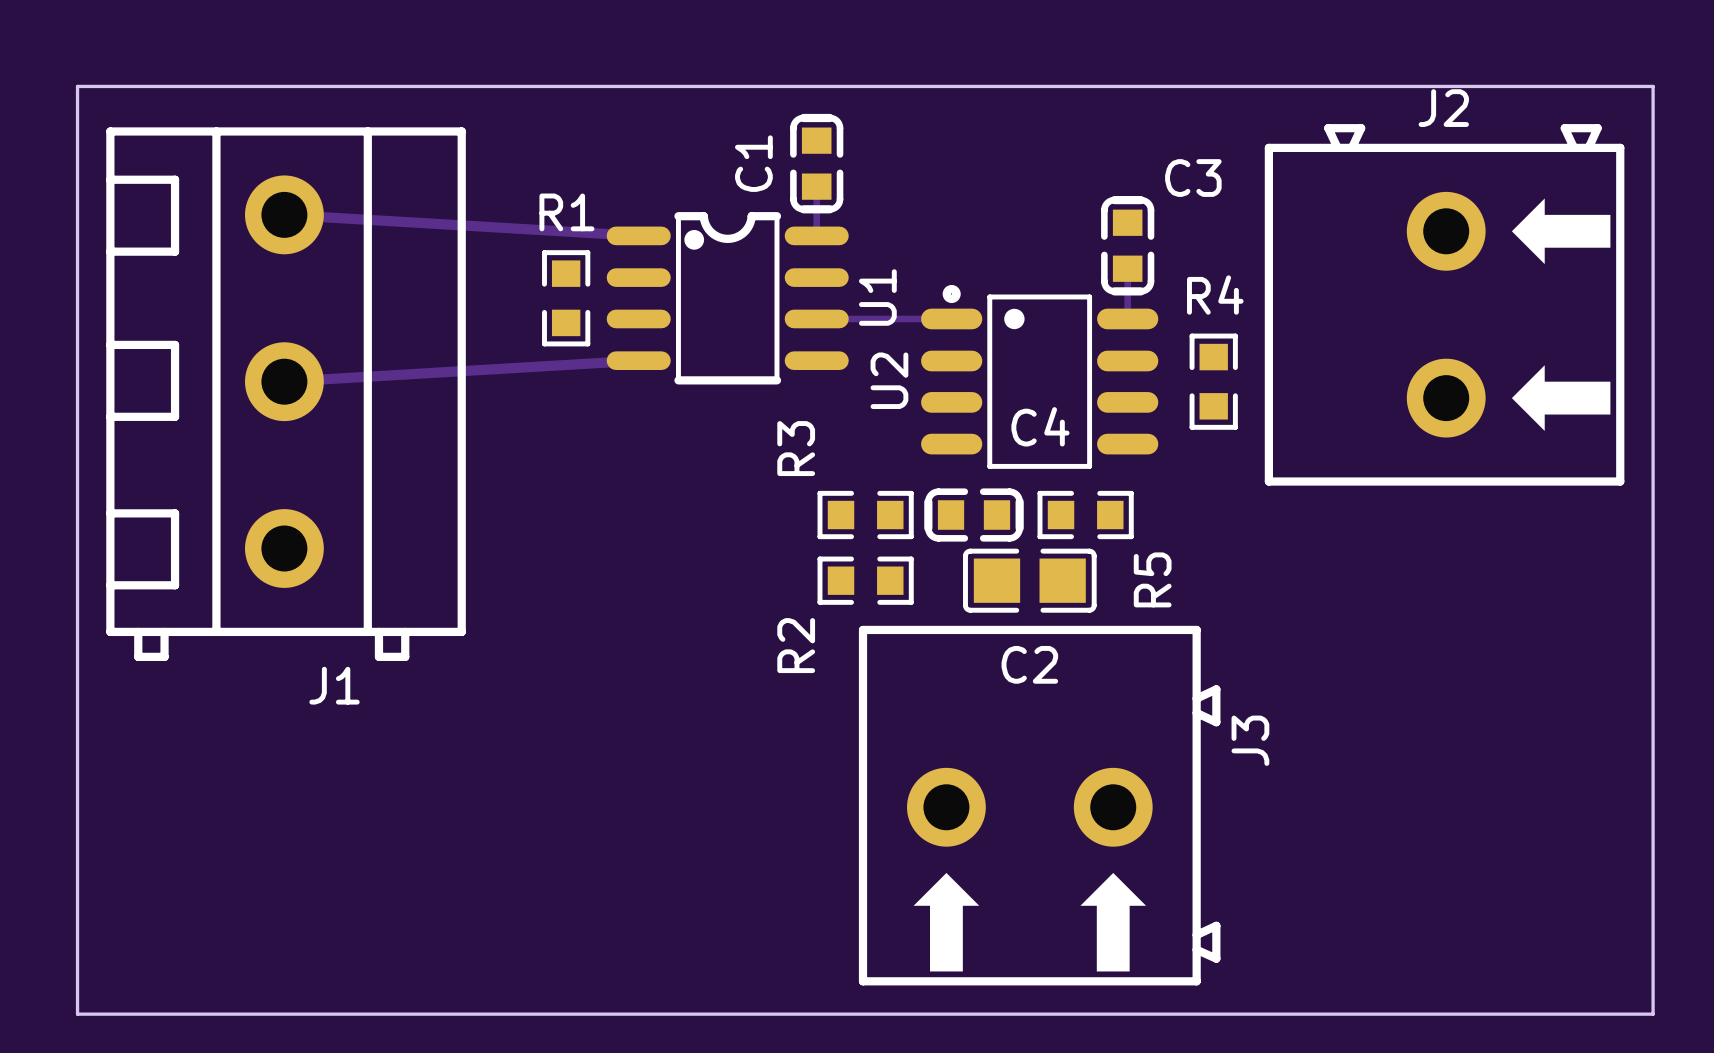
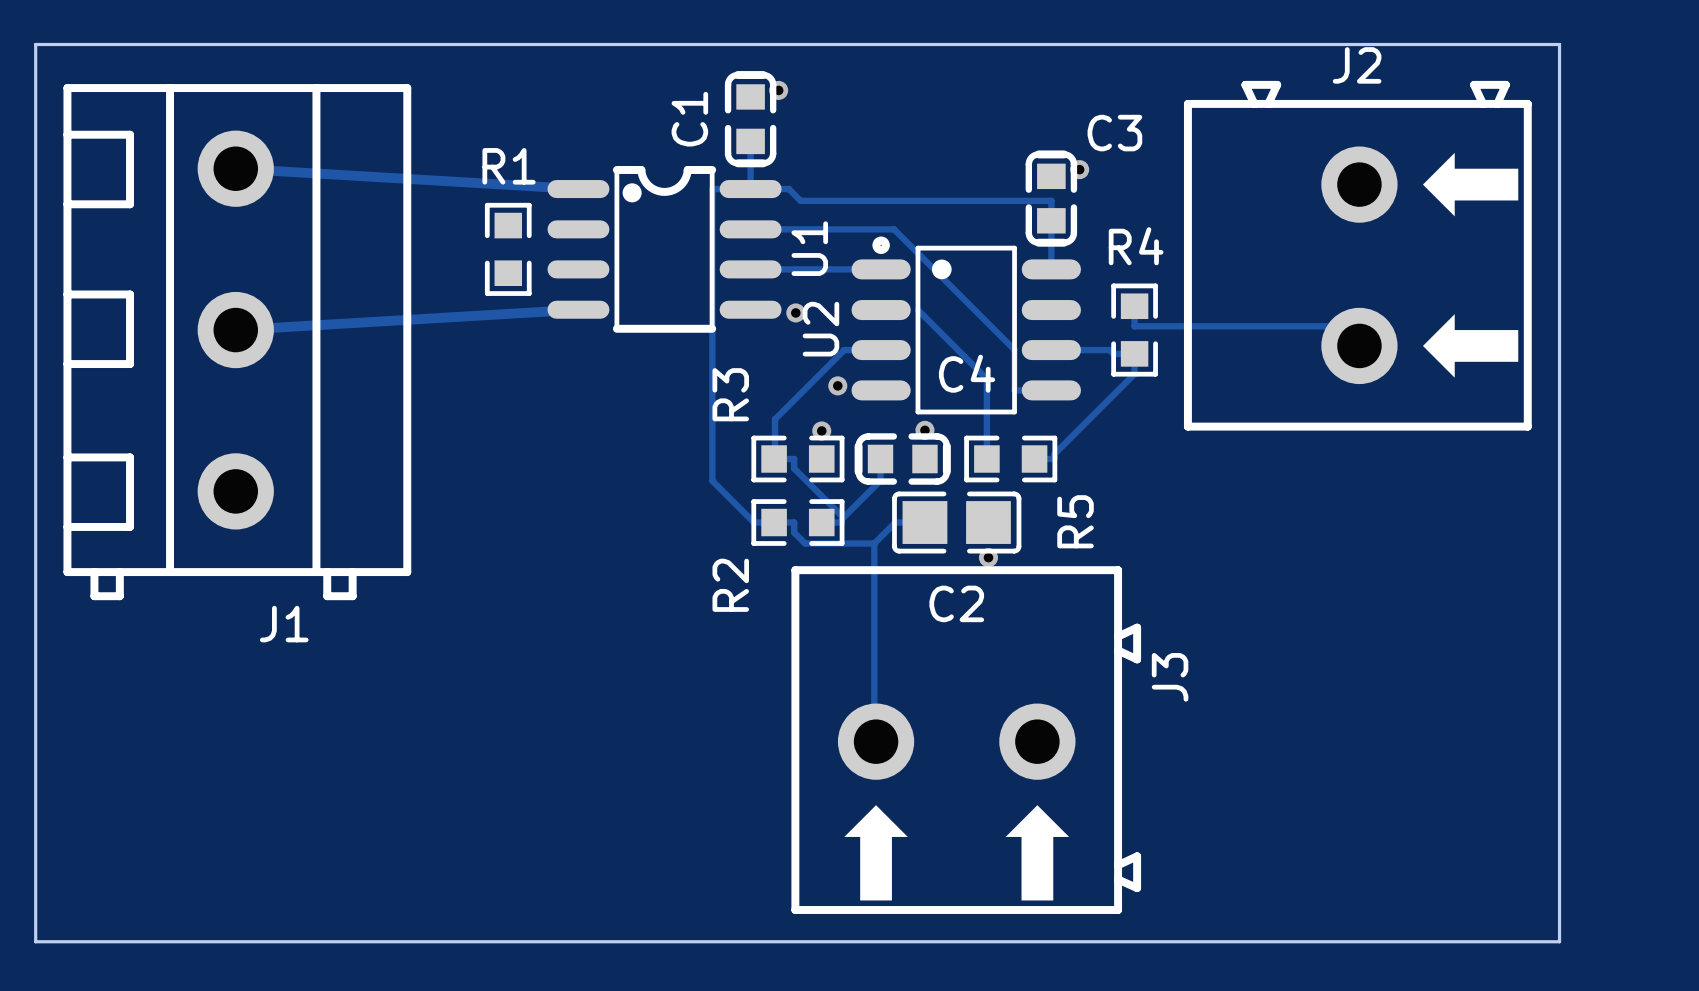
via: none -> (778, 90)
via: none -> (1079, 169)
track: none -> (1051, 220) (1051, 200) (800, 200) (788, 189) (712, 189) (712, 480) (754, 522) (794, 522) (794, 532) (805, 543) (874, 543)
track: none -> (750, 229) (894, 229) (1014, 349) (1014, 390) (1051, 390)
track: none -> (1134, 306) (1134, 326) (1339, 326) (1359, 345)
track: none -> (918, 310) (986, 378) (986, 459)
via: none -> (795, 312)
track: none -> (881, 350) (844, 350) (775, 419) (775, 459)
track: none -> (1051, 350) (1109, 350) (1113, 353) (1134, 353) (1134, 373) (1054, 453) (1054, 459) (1034, 459)
via: none -> (837, 385)
via: none -> (924, 430)
via: none -> (821, 430)
track: none -> (774, 459) (794, 459) (794, 468) (843, 517)
track: none -> (880, 459) (880, 480) (841, 519) (841, 522) (821, 522)
track: none -> (924, 522) (895, 522) (874, 543)
track: none -> (874, 543) (874, 739) (876, 741)
via: none -> (988, 557)

